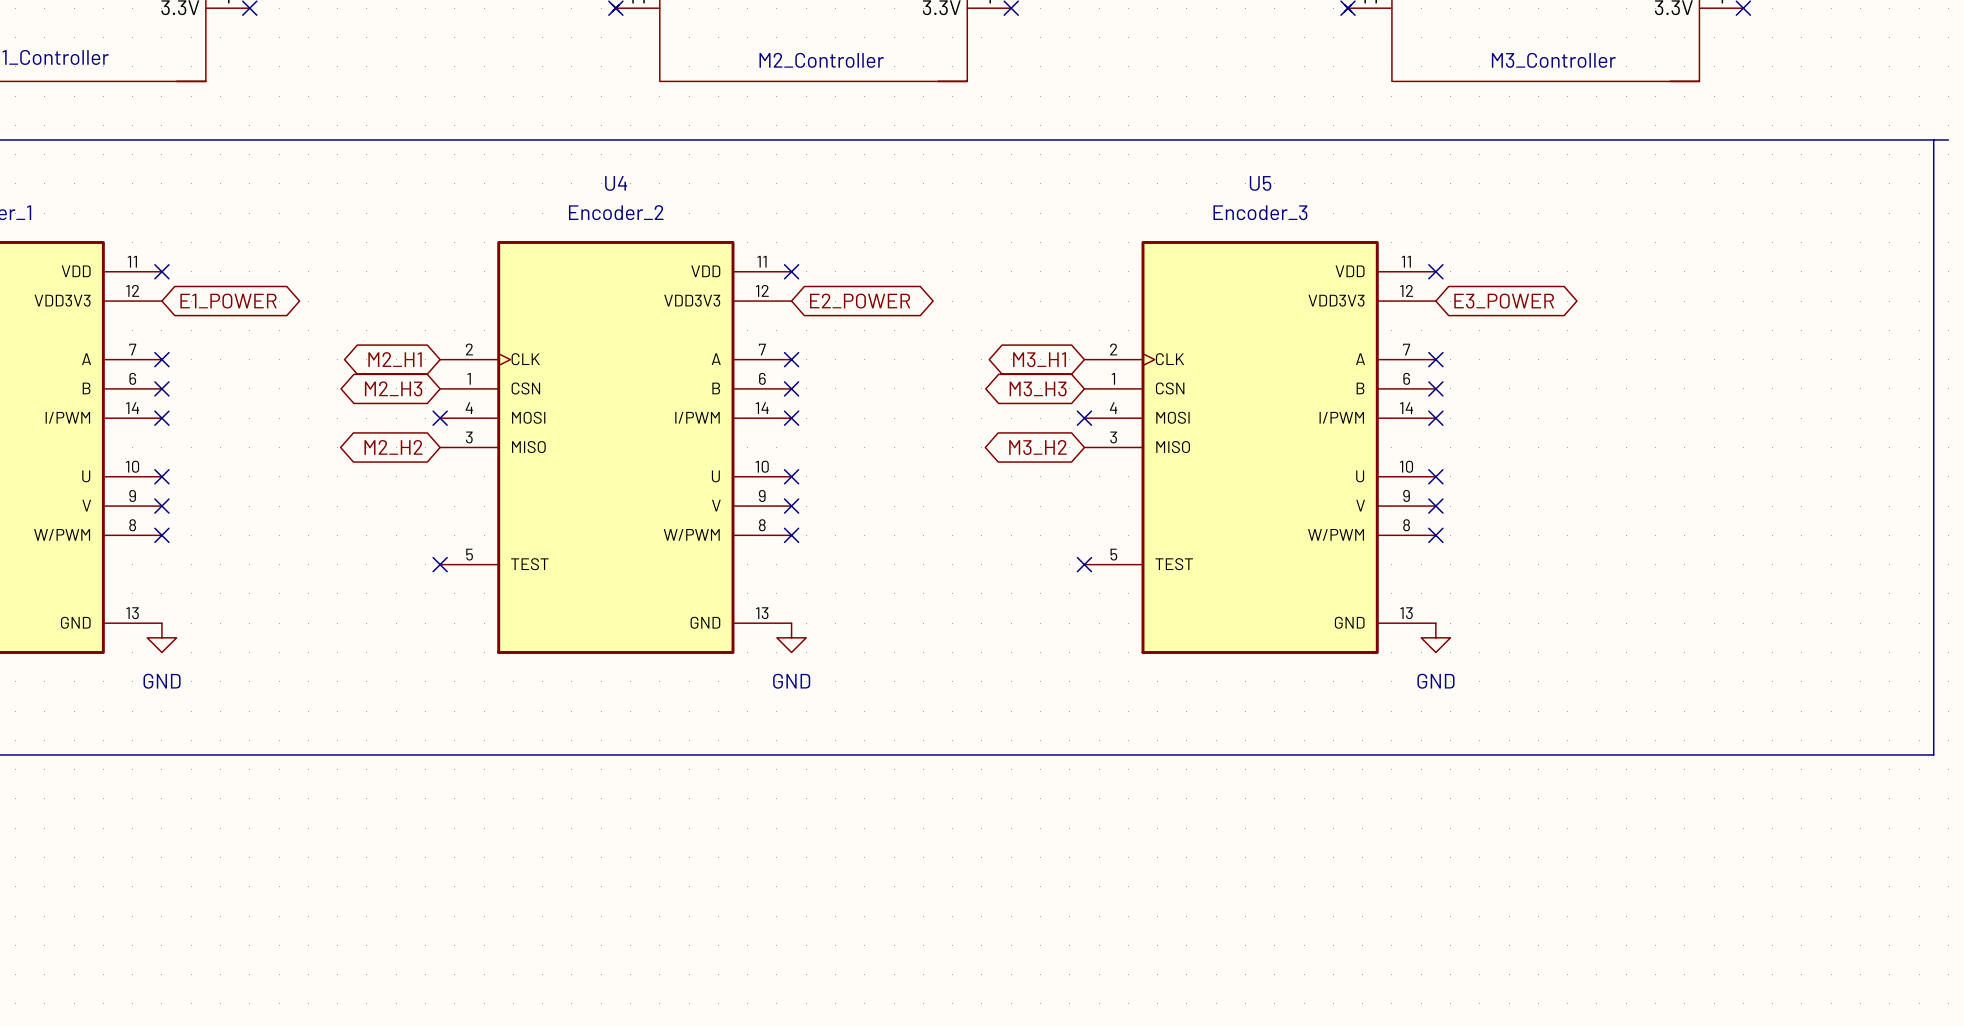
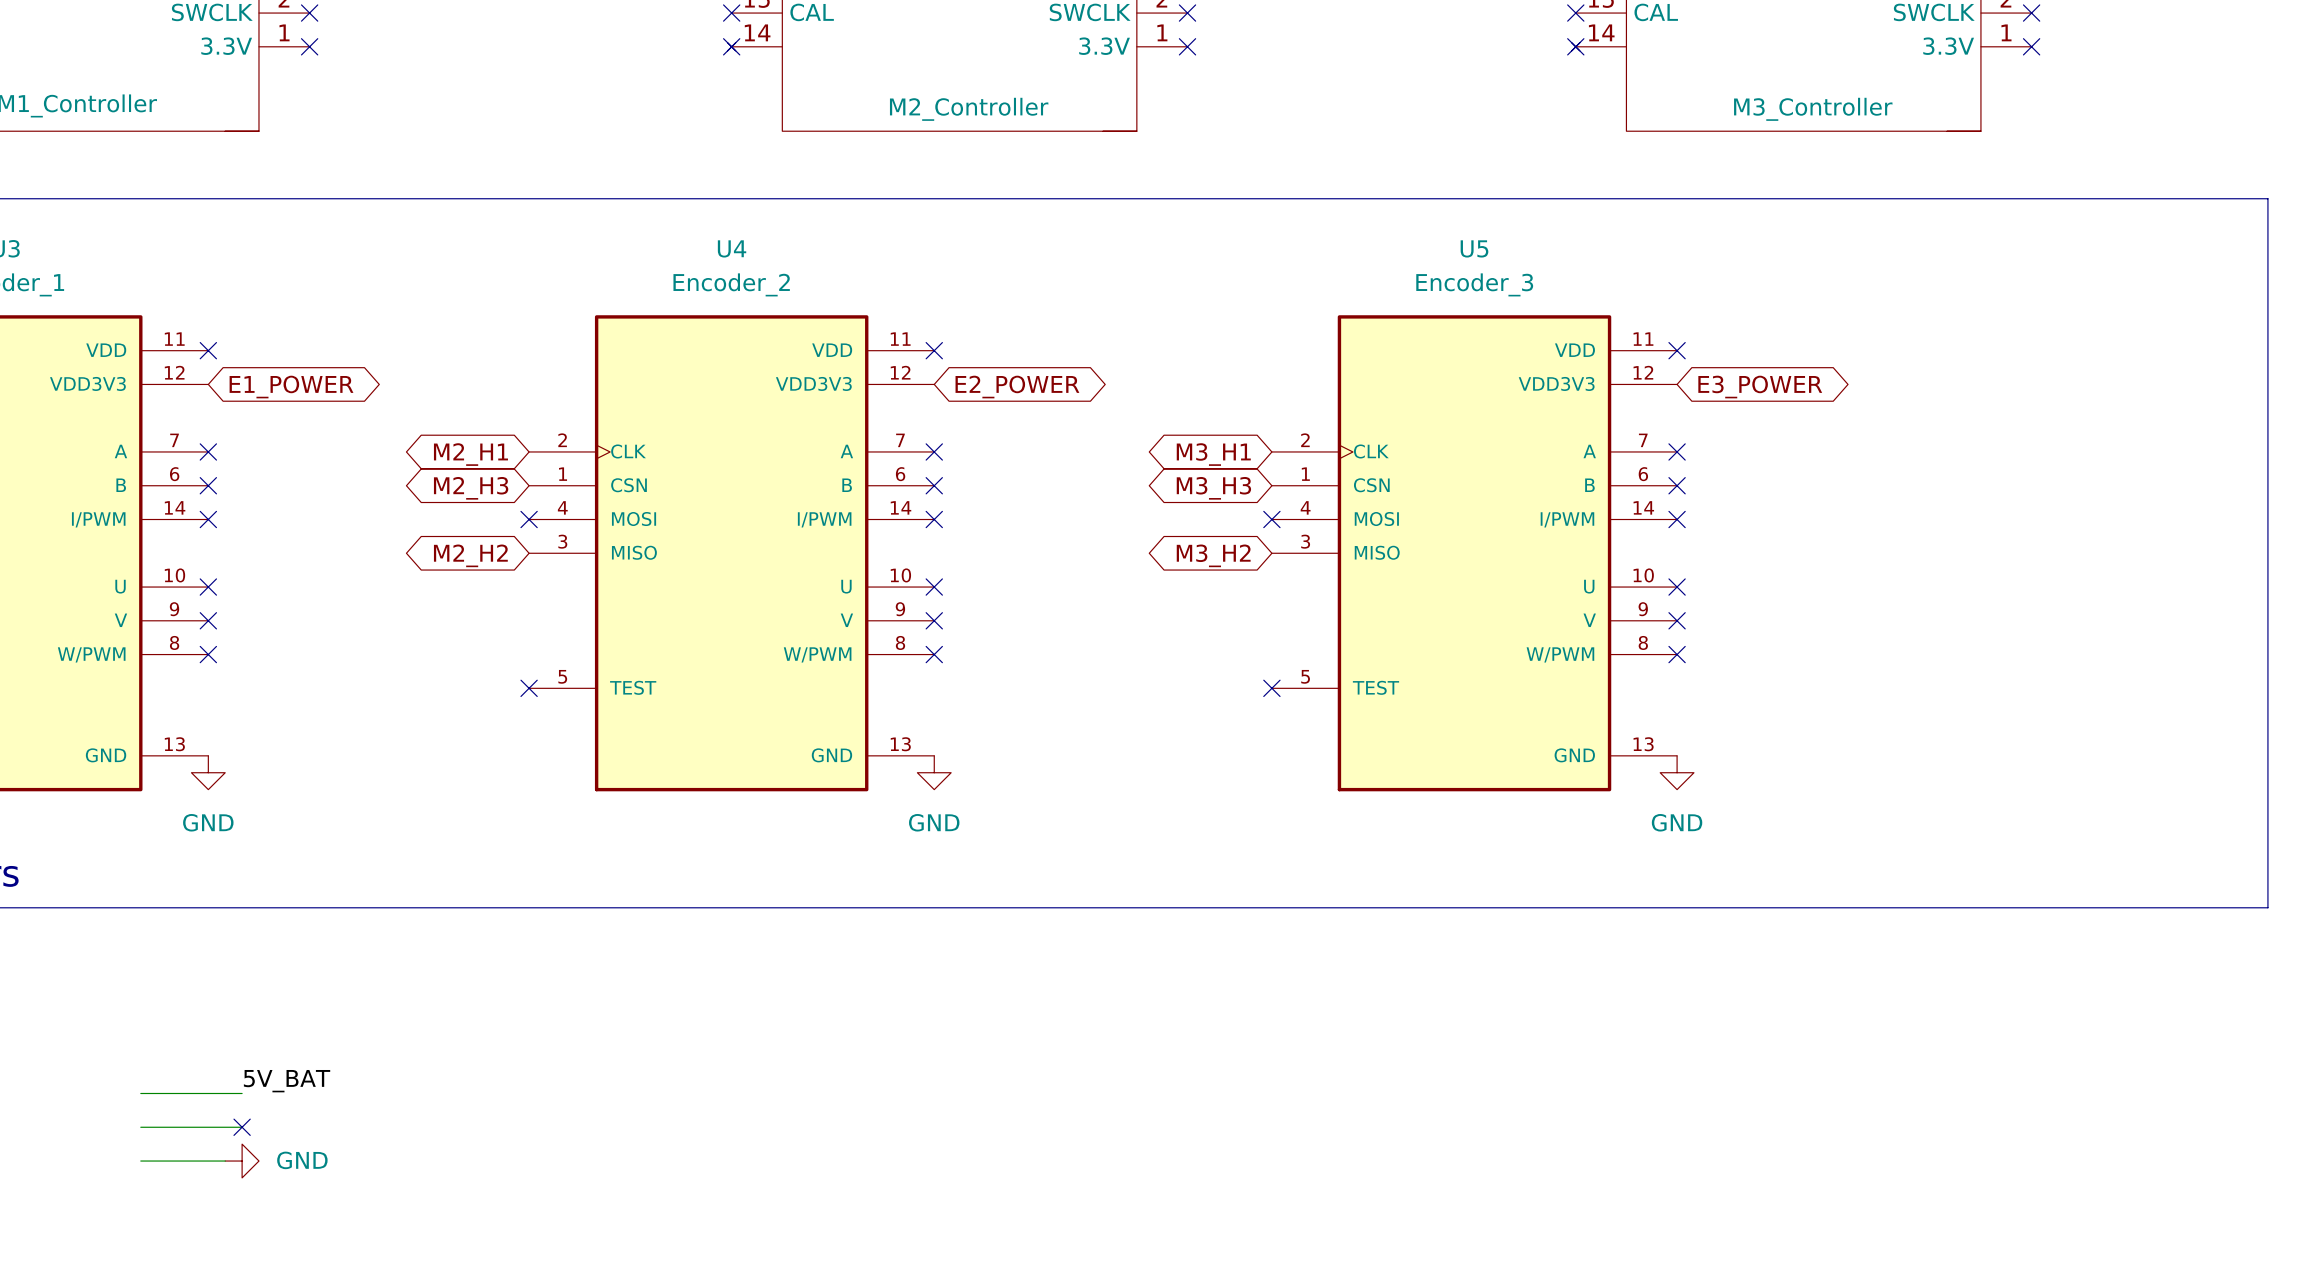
line: (1933, 139) (1933, 754) -> (2267, 198) (2267, 907) (2251, 907)
label: none -> 5V_BAT (287, 1081)
wire: none -> (140, 1093) (242, 1093)
wire: none -> (140, 1127) (242, 1127)
no-connect mark: none -> (242, 1127)
wire: none -> (140, 1161) (225, 1161)
power symbol: none -> GND (242, 1161)

